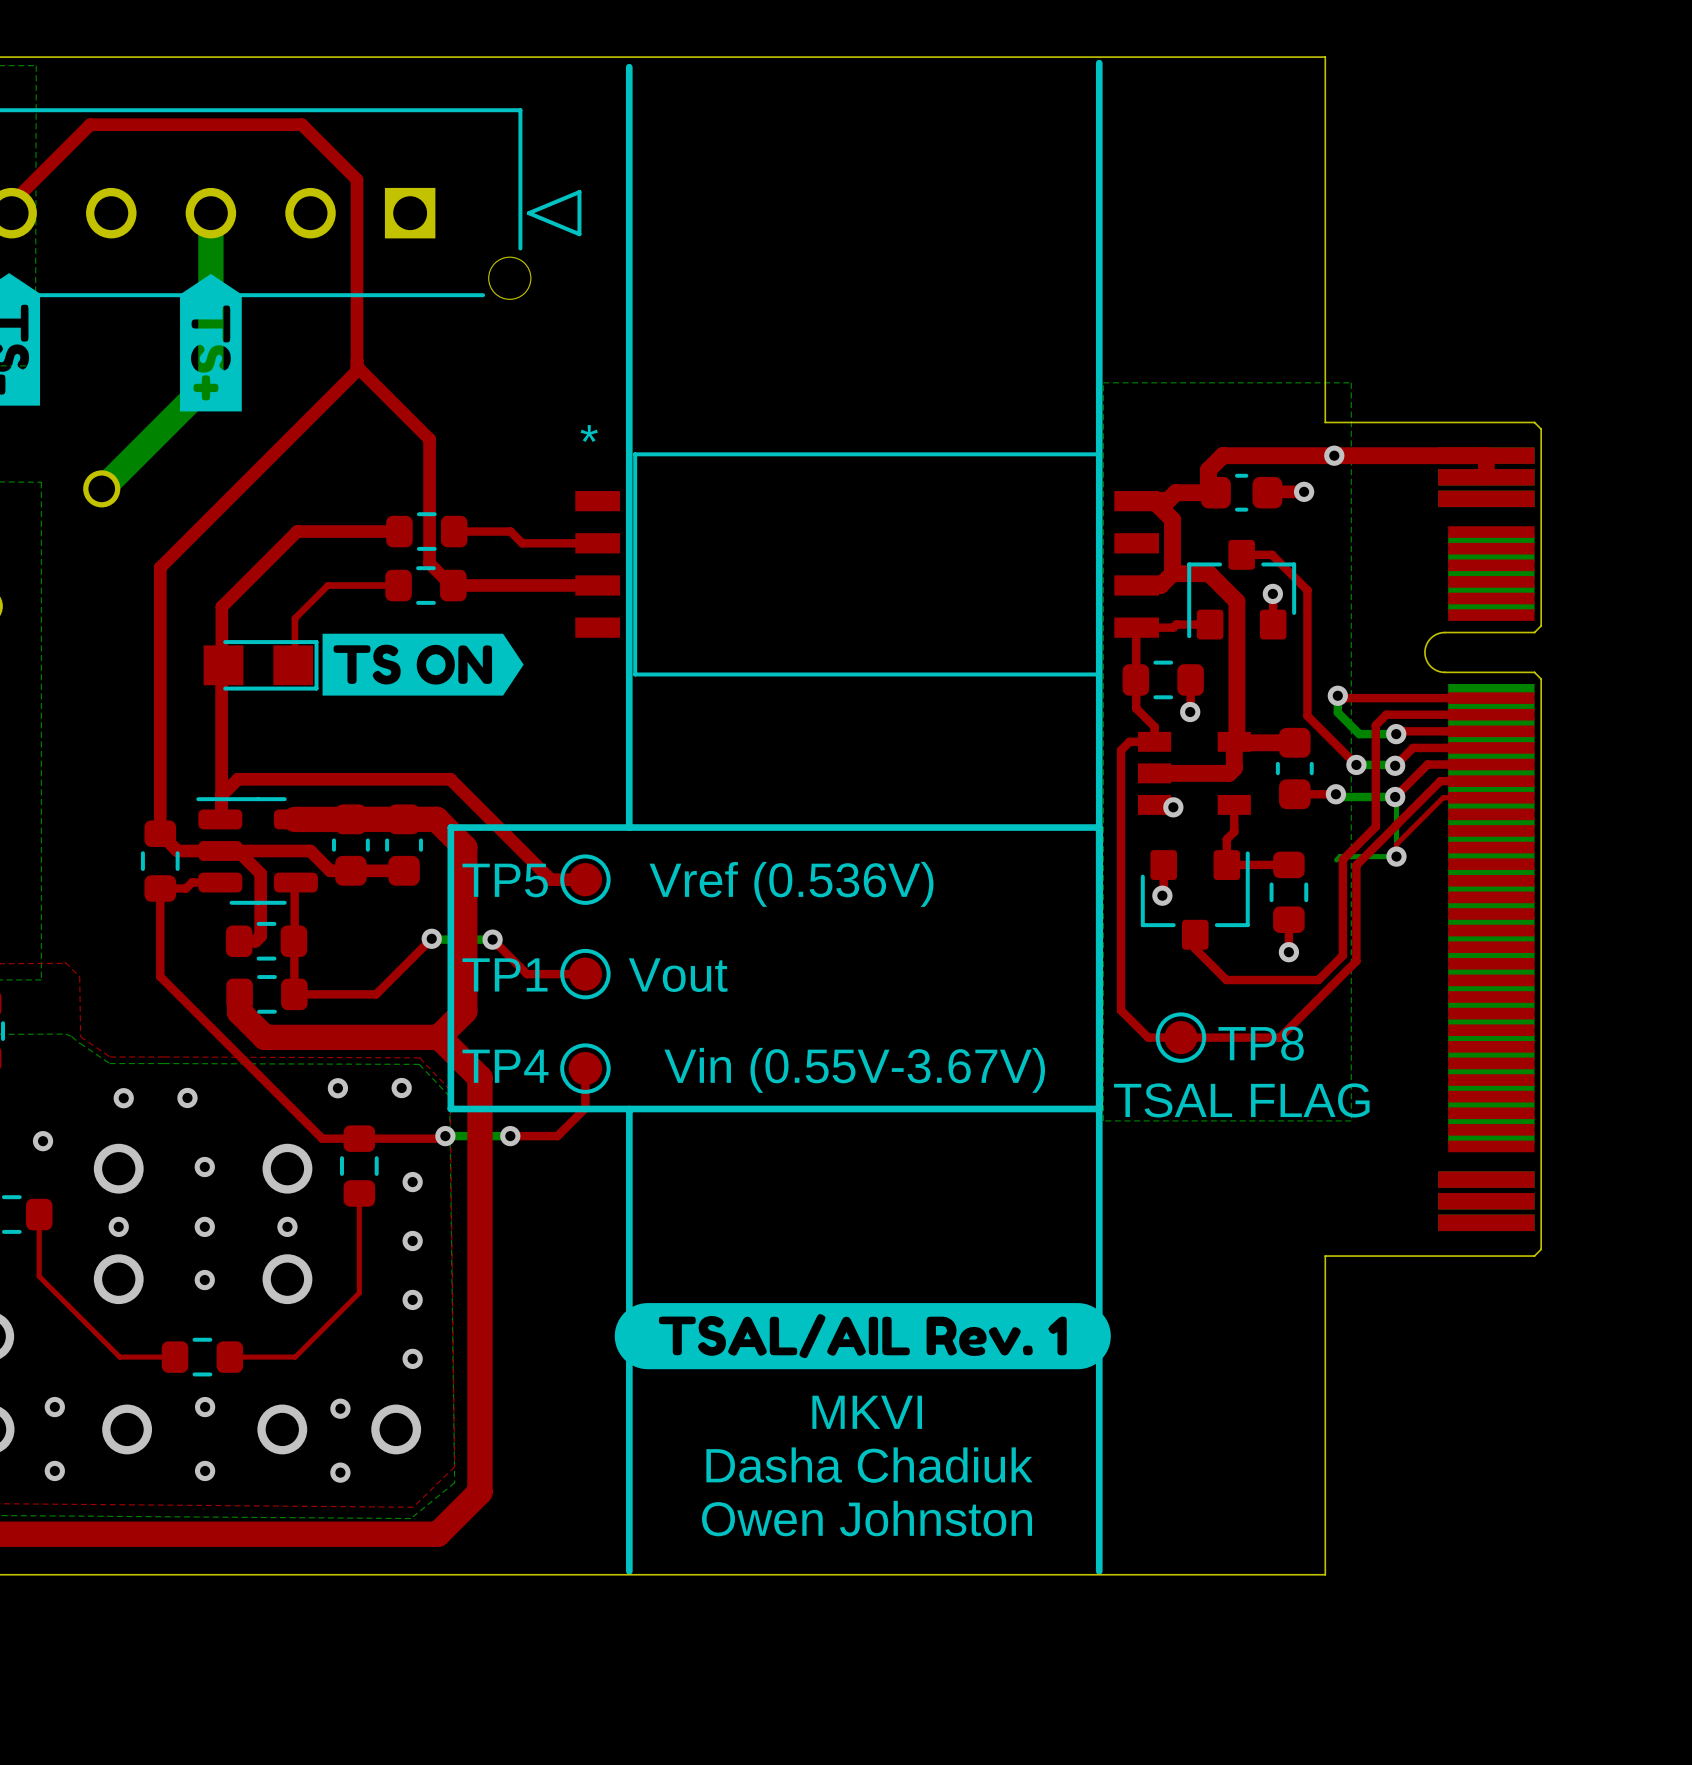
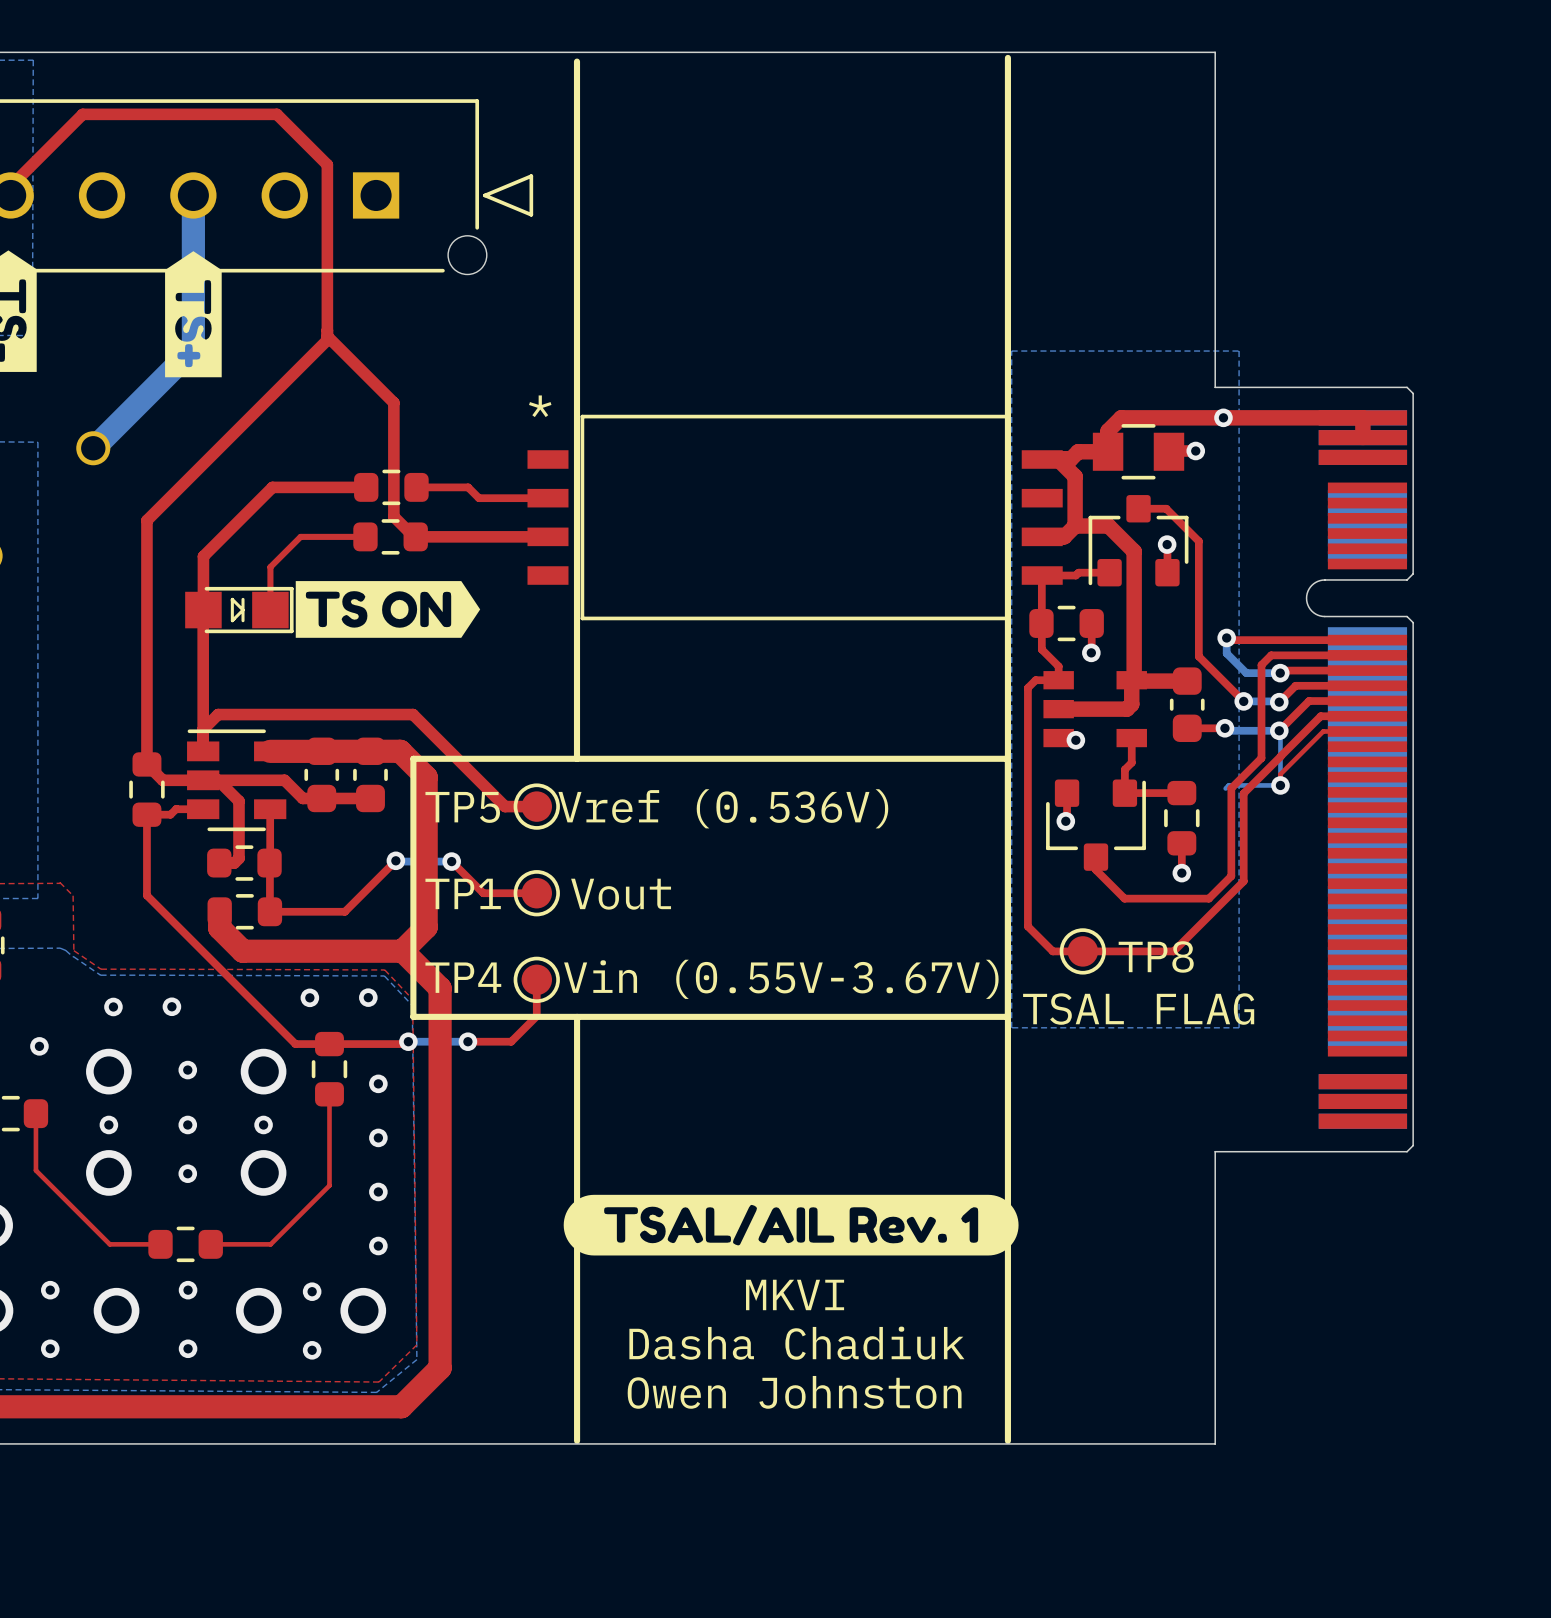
part footprint: [1200, 473, 1283, 512] -> [1092, 424, 1185, 480]
part footprint: [203, 640, 319, 691] -> [185, 586, 294, 634]
part footprint: [196, 797, 318, 905] -> [187, 729, 287, 832]

